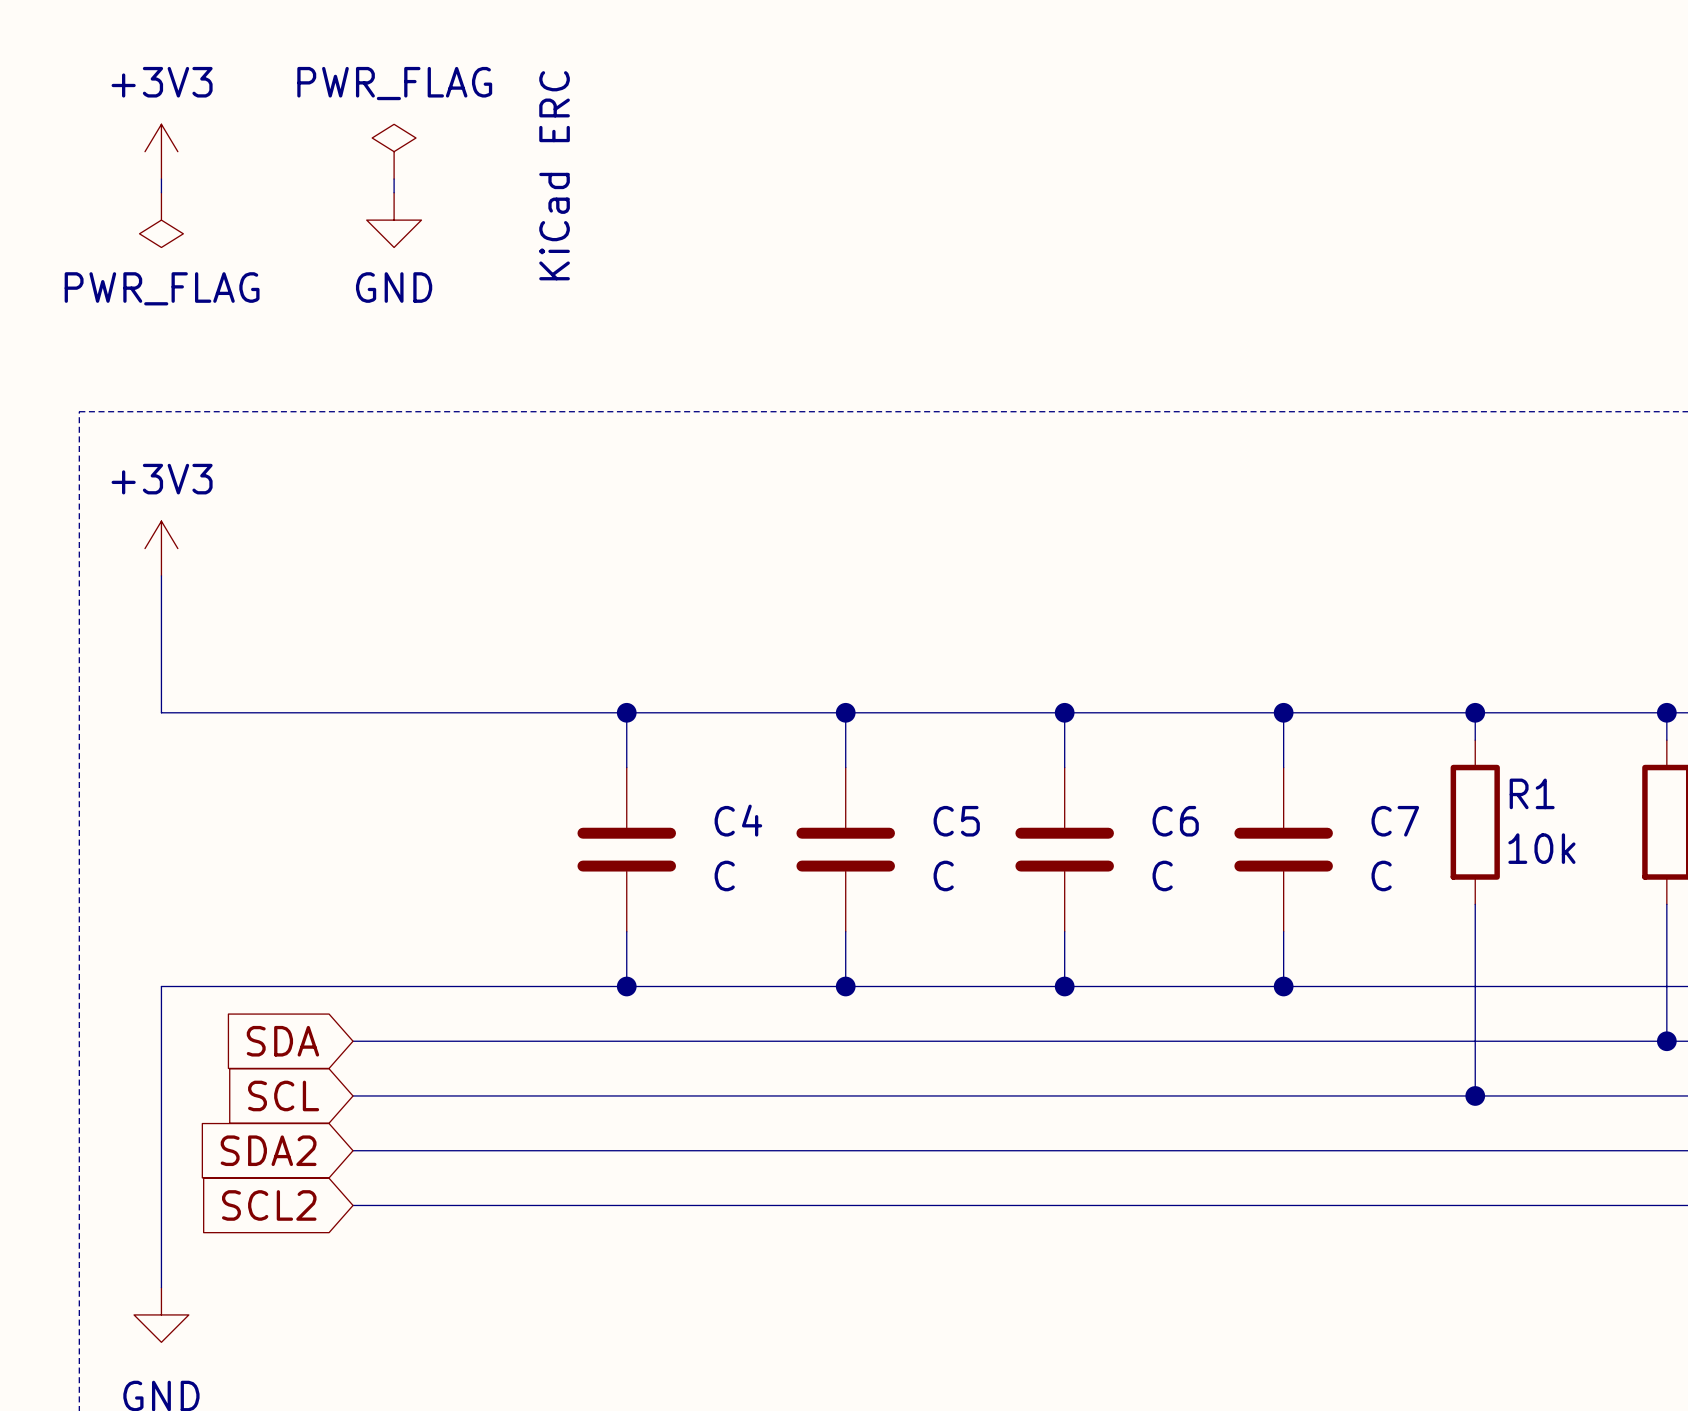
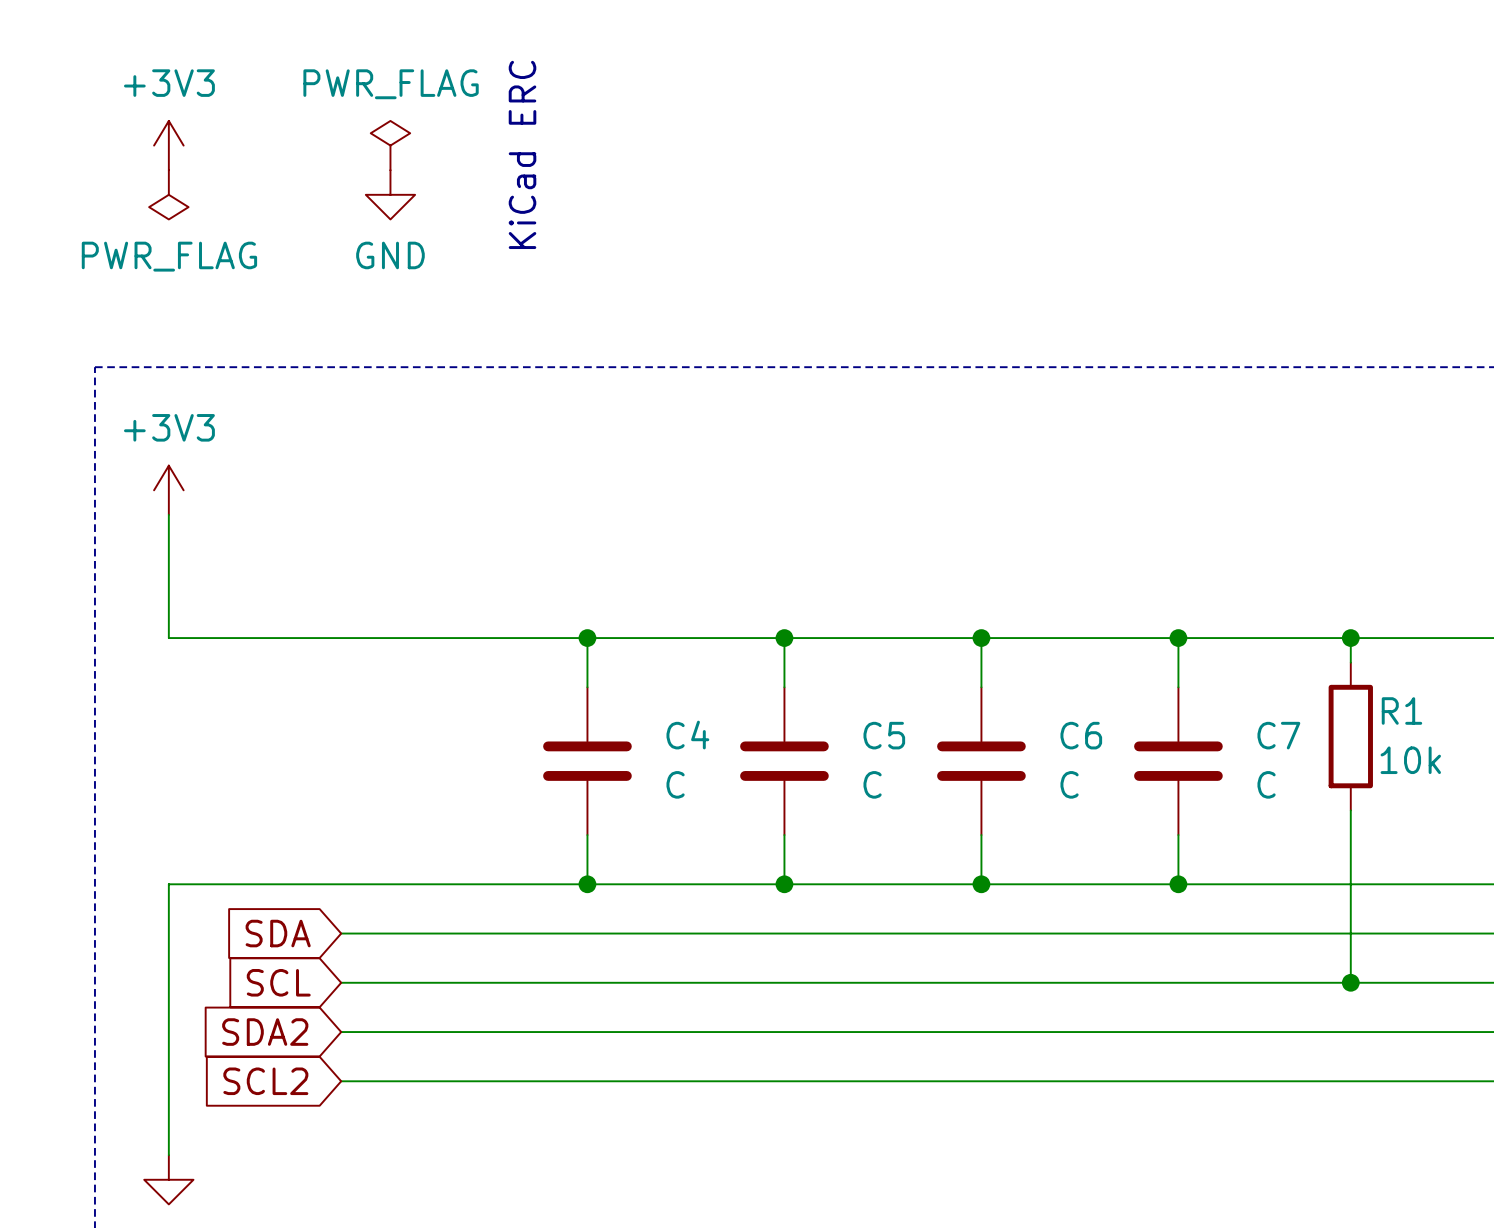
power symbol position: +3V3 (161, 151) -> +3V3 (168, 145)
power symbol position: PWR_FLAG (394, 151) -> PWR_FLAG (390, 145)
wire: (394, 179) (394, 192) -> none
power symbol position: GND (394, 220) -> GND (390, 194)

